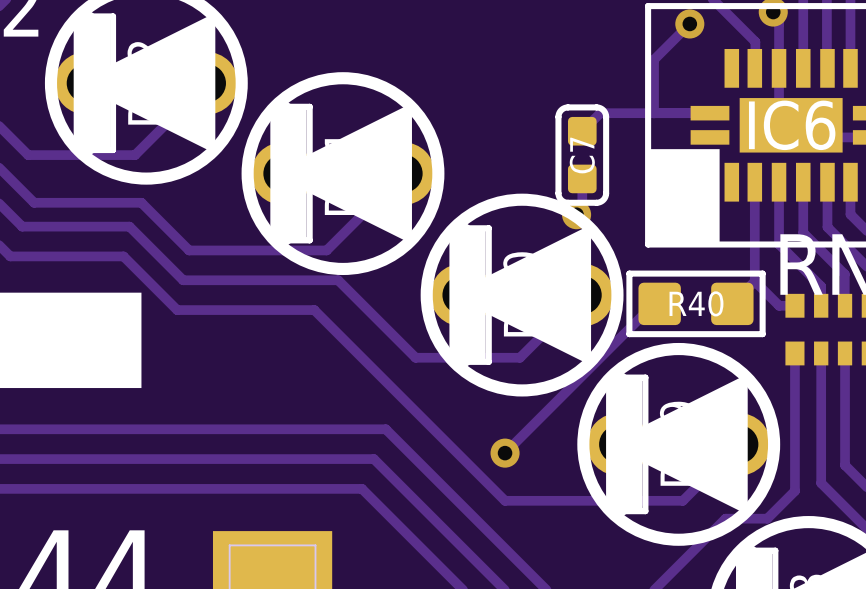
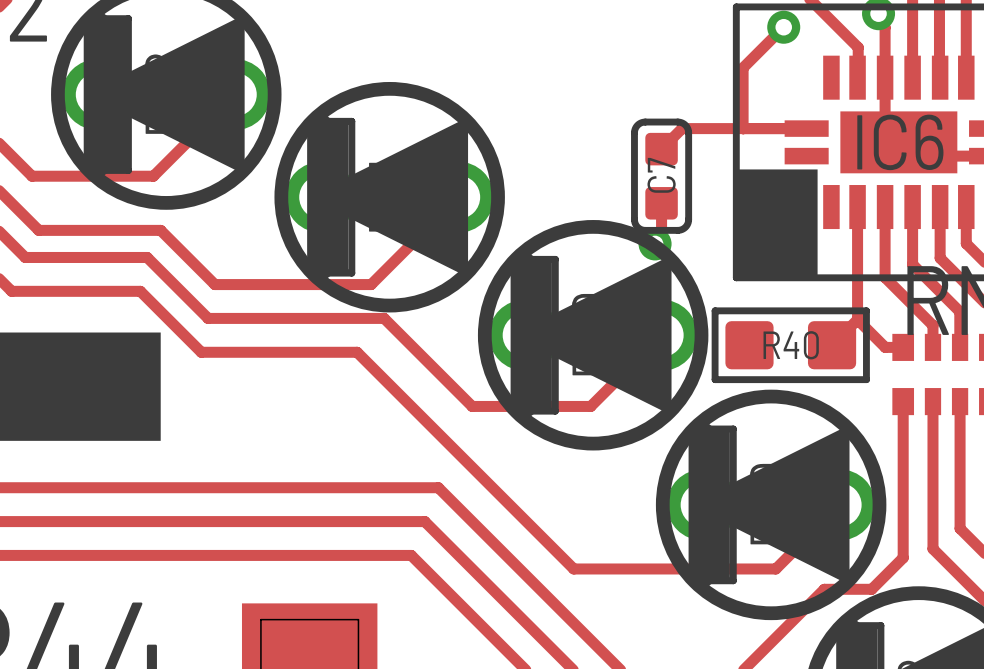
track: (659, 303) (654, 303) (505, 453) -> none
via: (505, 453) -> none

